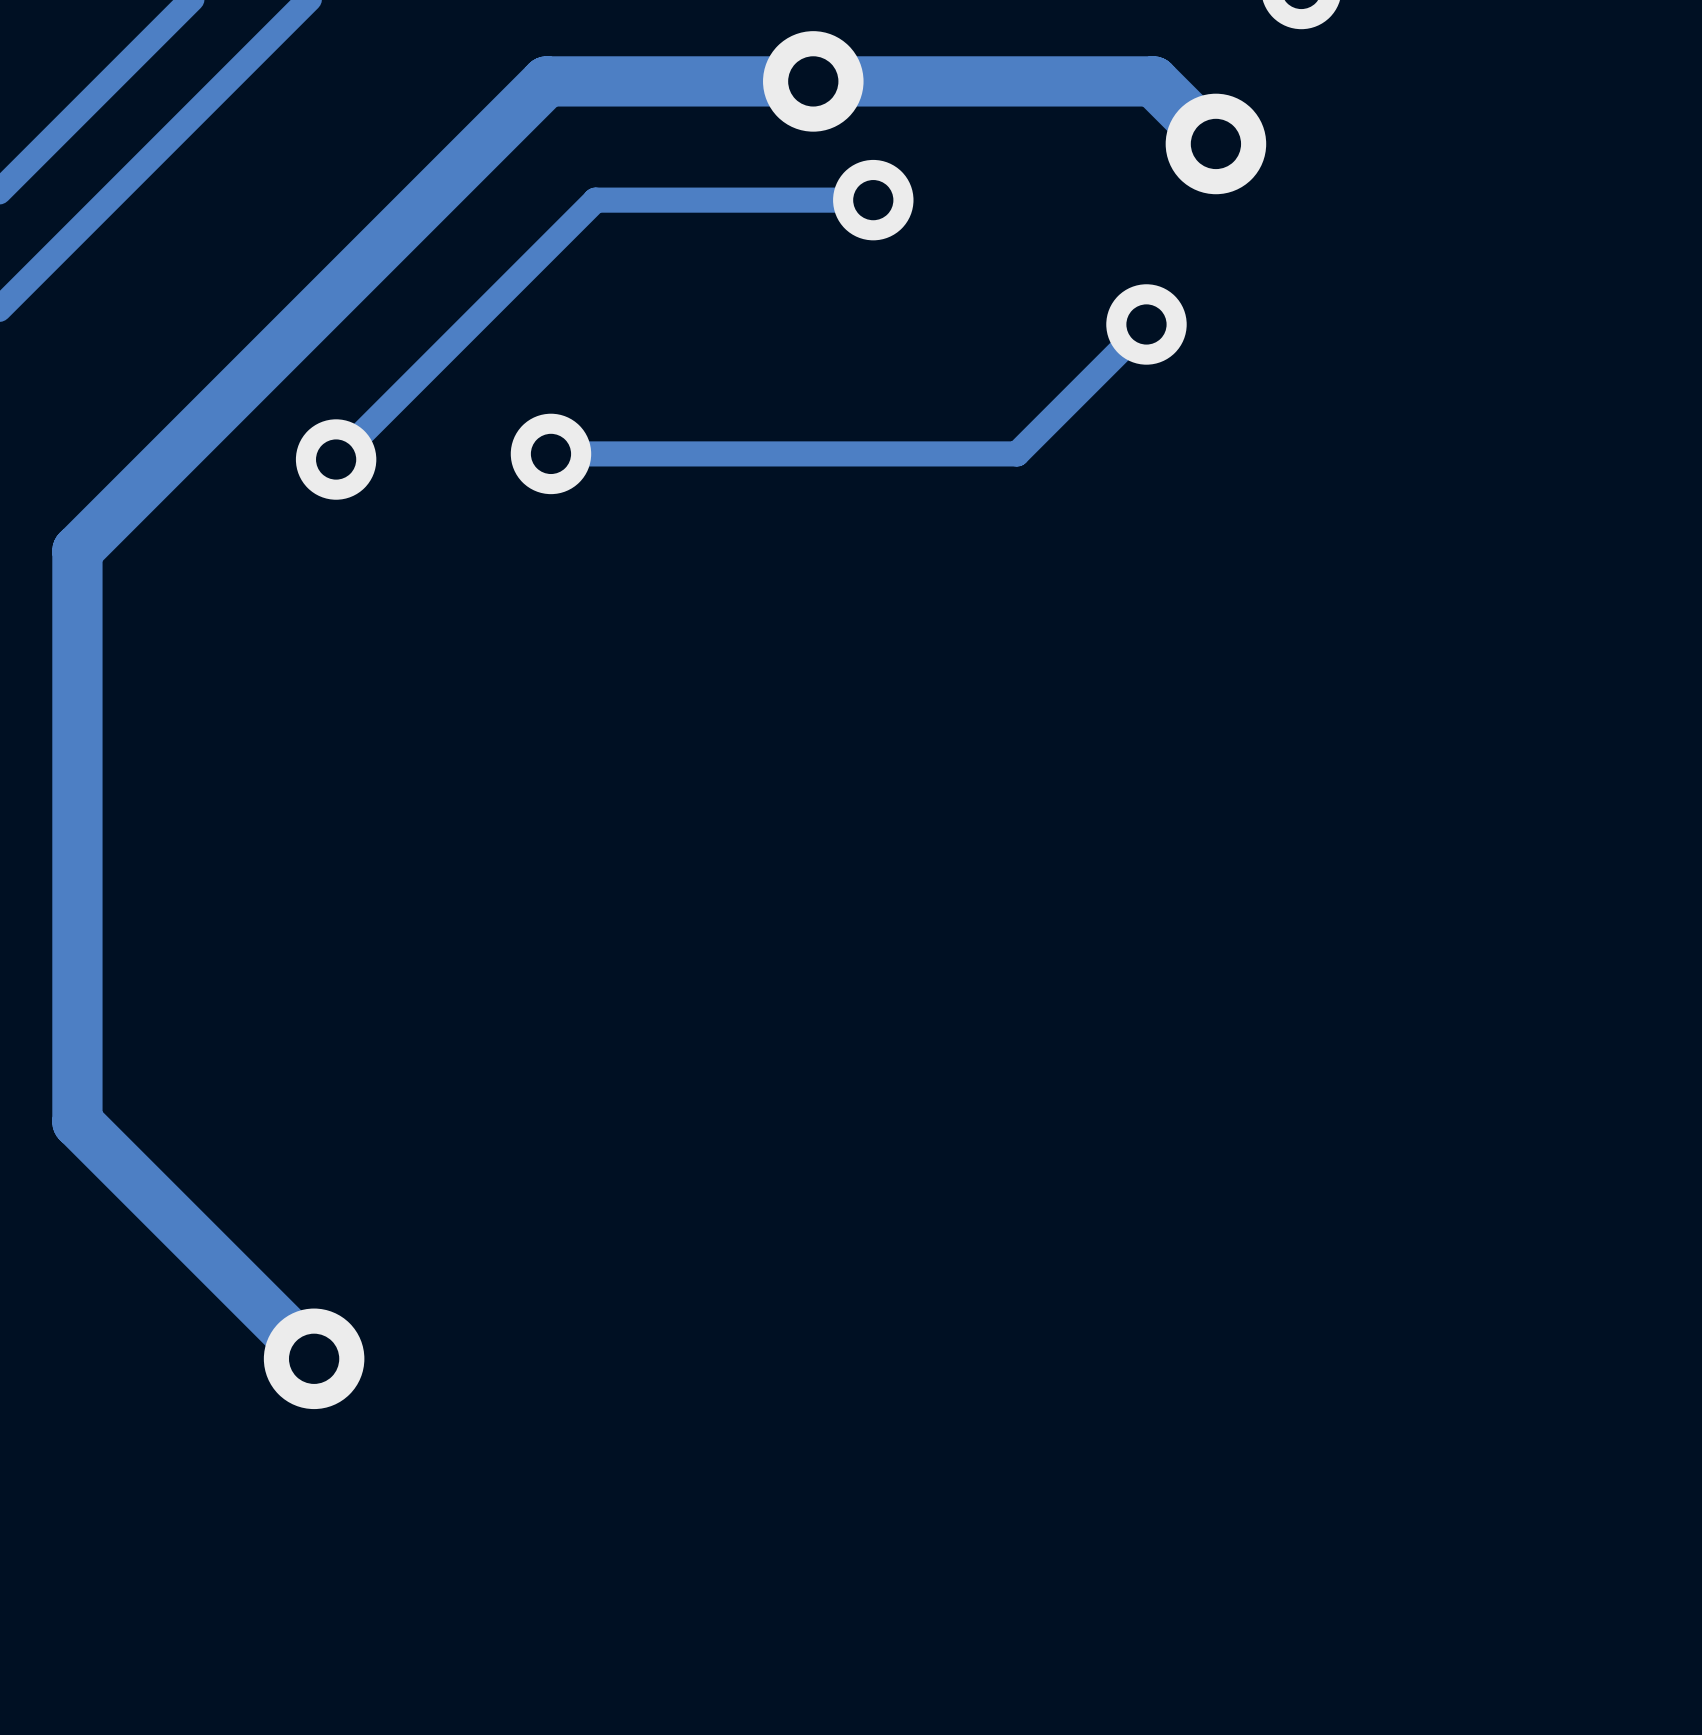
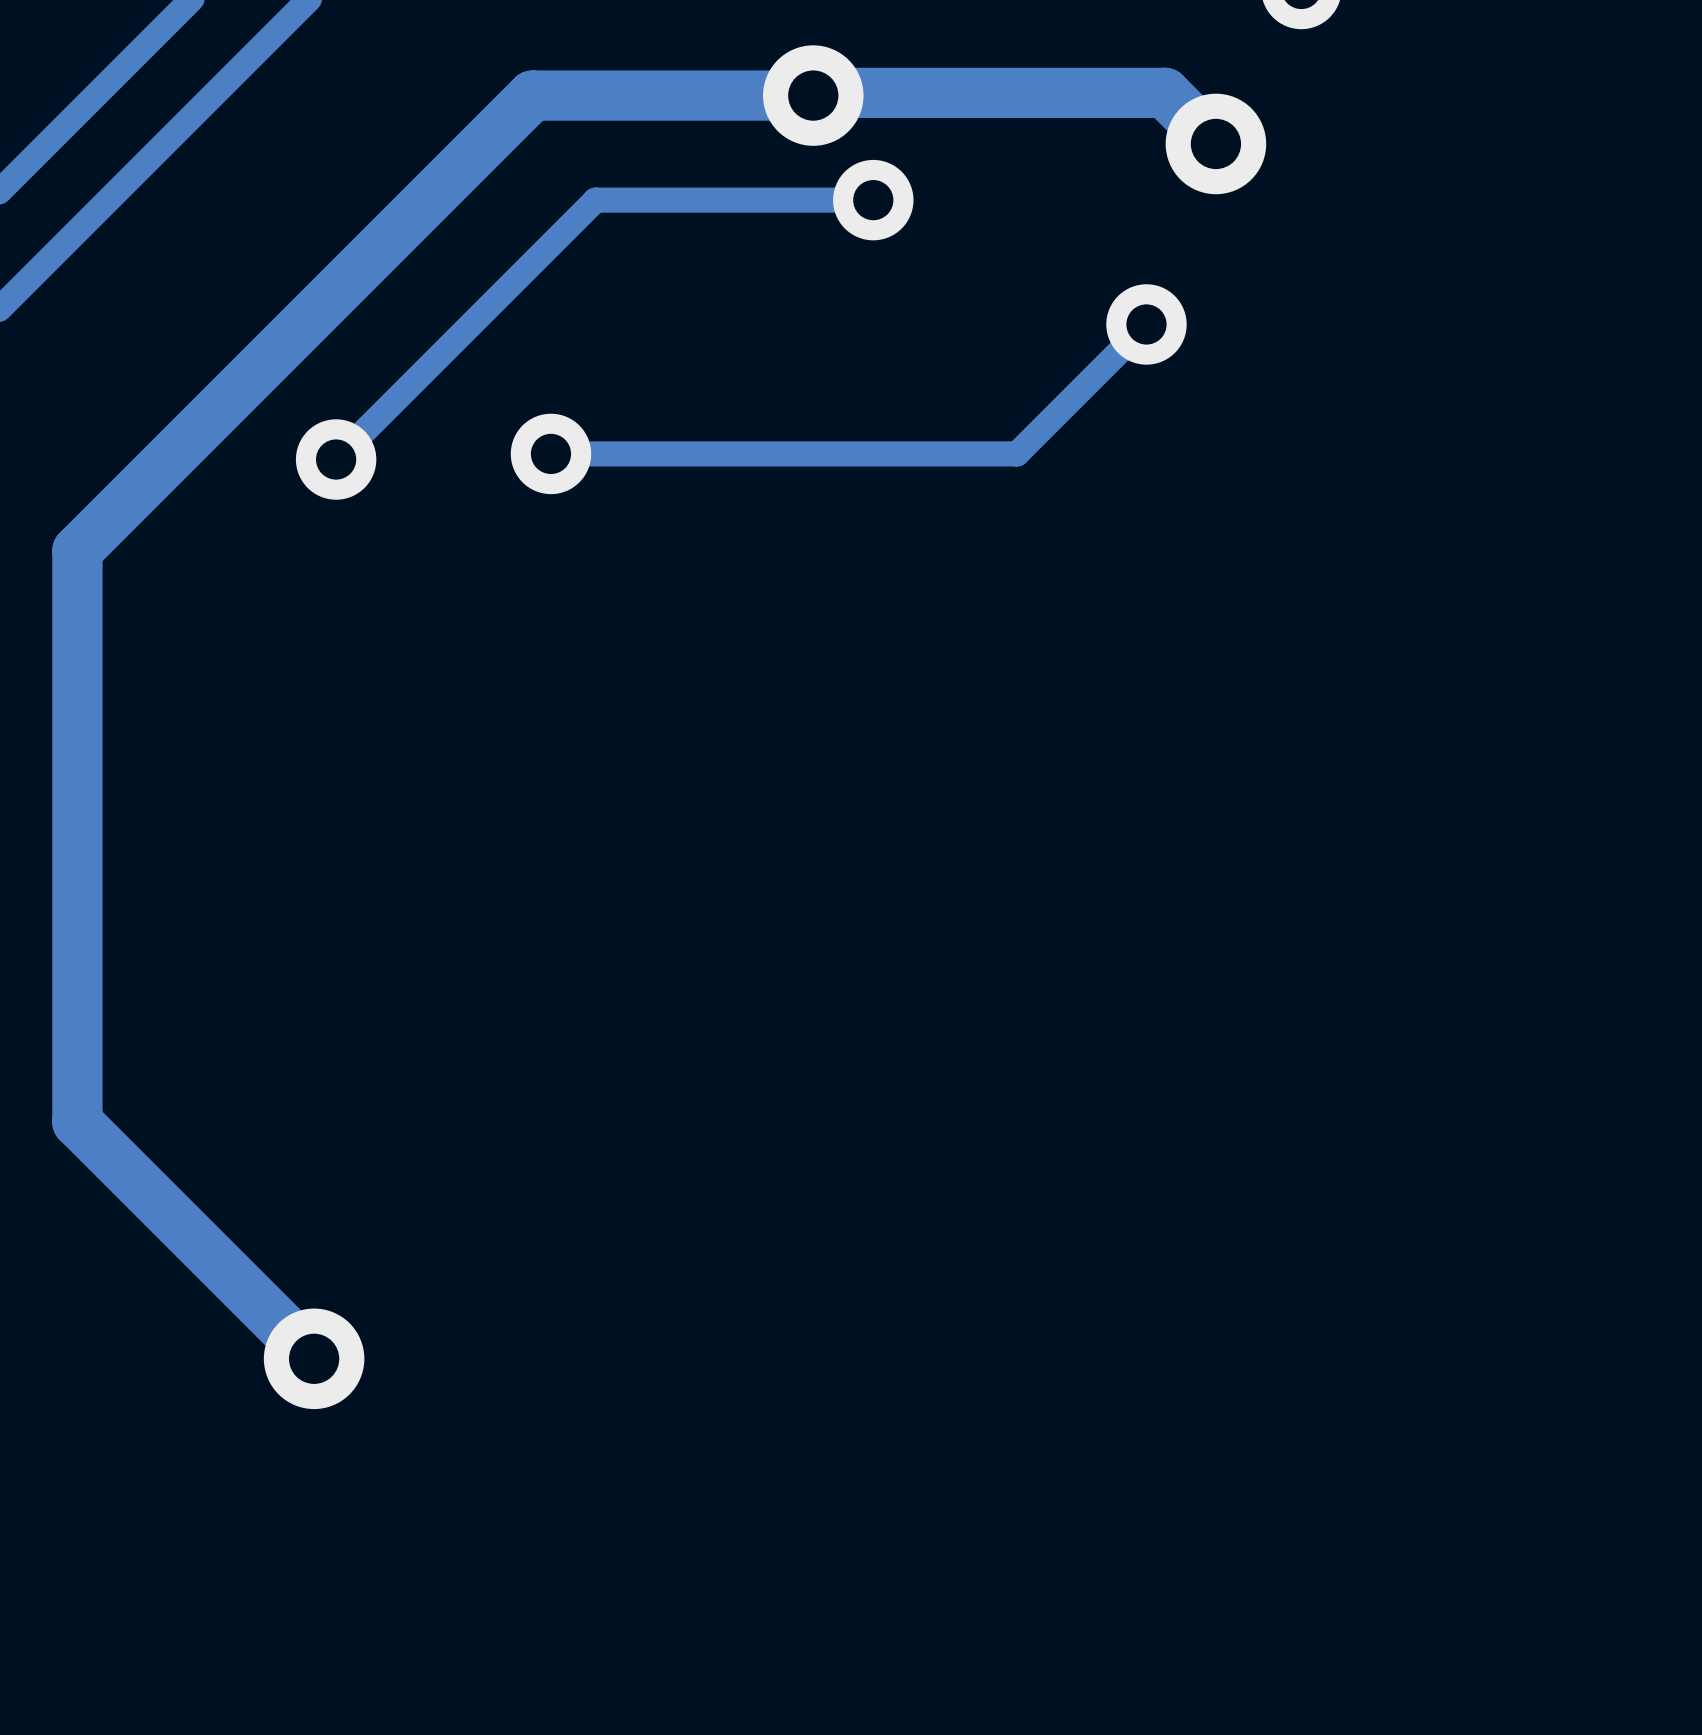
via position: (813, 81) -> (813, 95)
track: (1164, 92) (1153, 81) (546, 81) (532, 95) -> (1164, 92) (532, 95)

